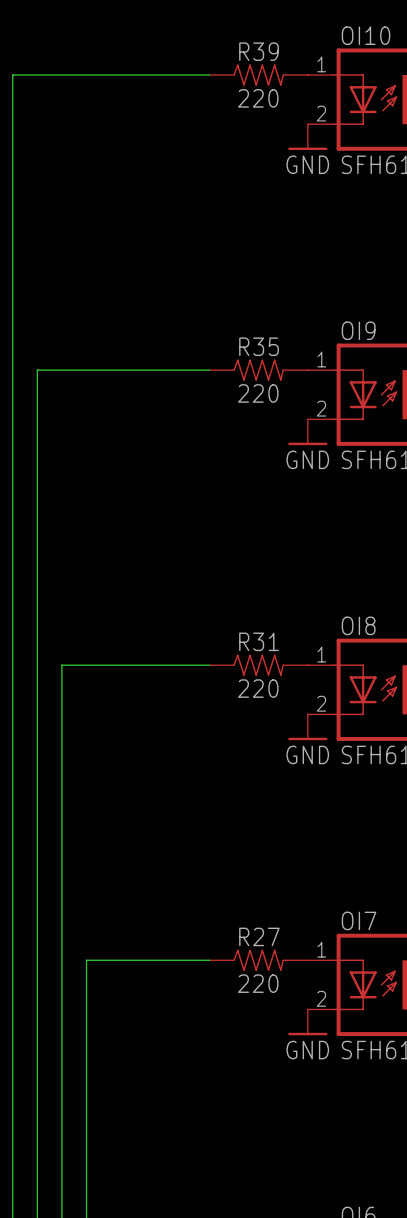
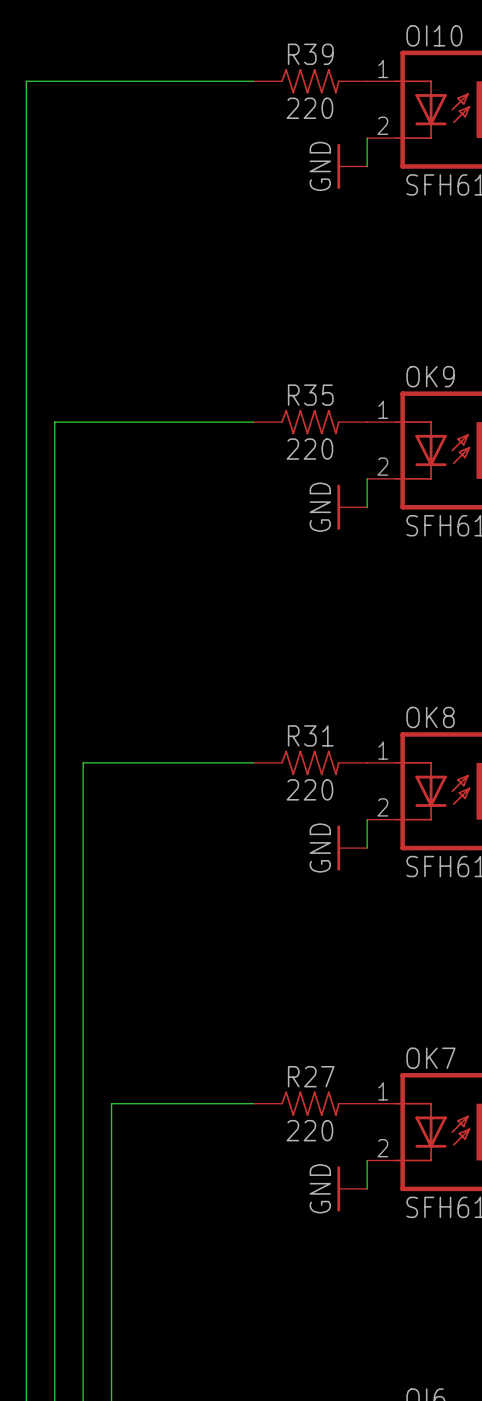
power symbol rotation: 0° (307, 148) -> 90° clockwise (338, 166)
OI9 name: OI9 (358, 330) -> OK9 (430, 376)
power symbol rotation: 0° (307, 443) -> 90° clockwise (338, 507)
OI8 name: OI8 (358, 625) -> OK8 (430, 717)
power symbol rotation: 0° (307, 738) -> 90° clockwise (338, 848)
OI7 name: OI7 (359, 920) -> OK7 (430, 1058)
power symbol rotation: 0° (307, 1034) -> 90° clockwise (338, 1188)

